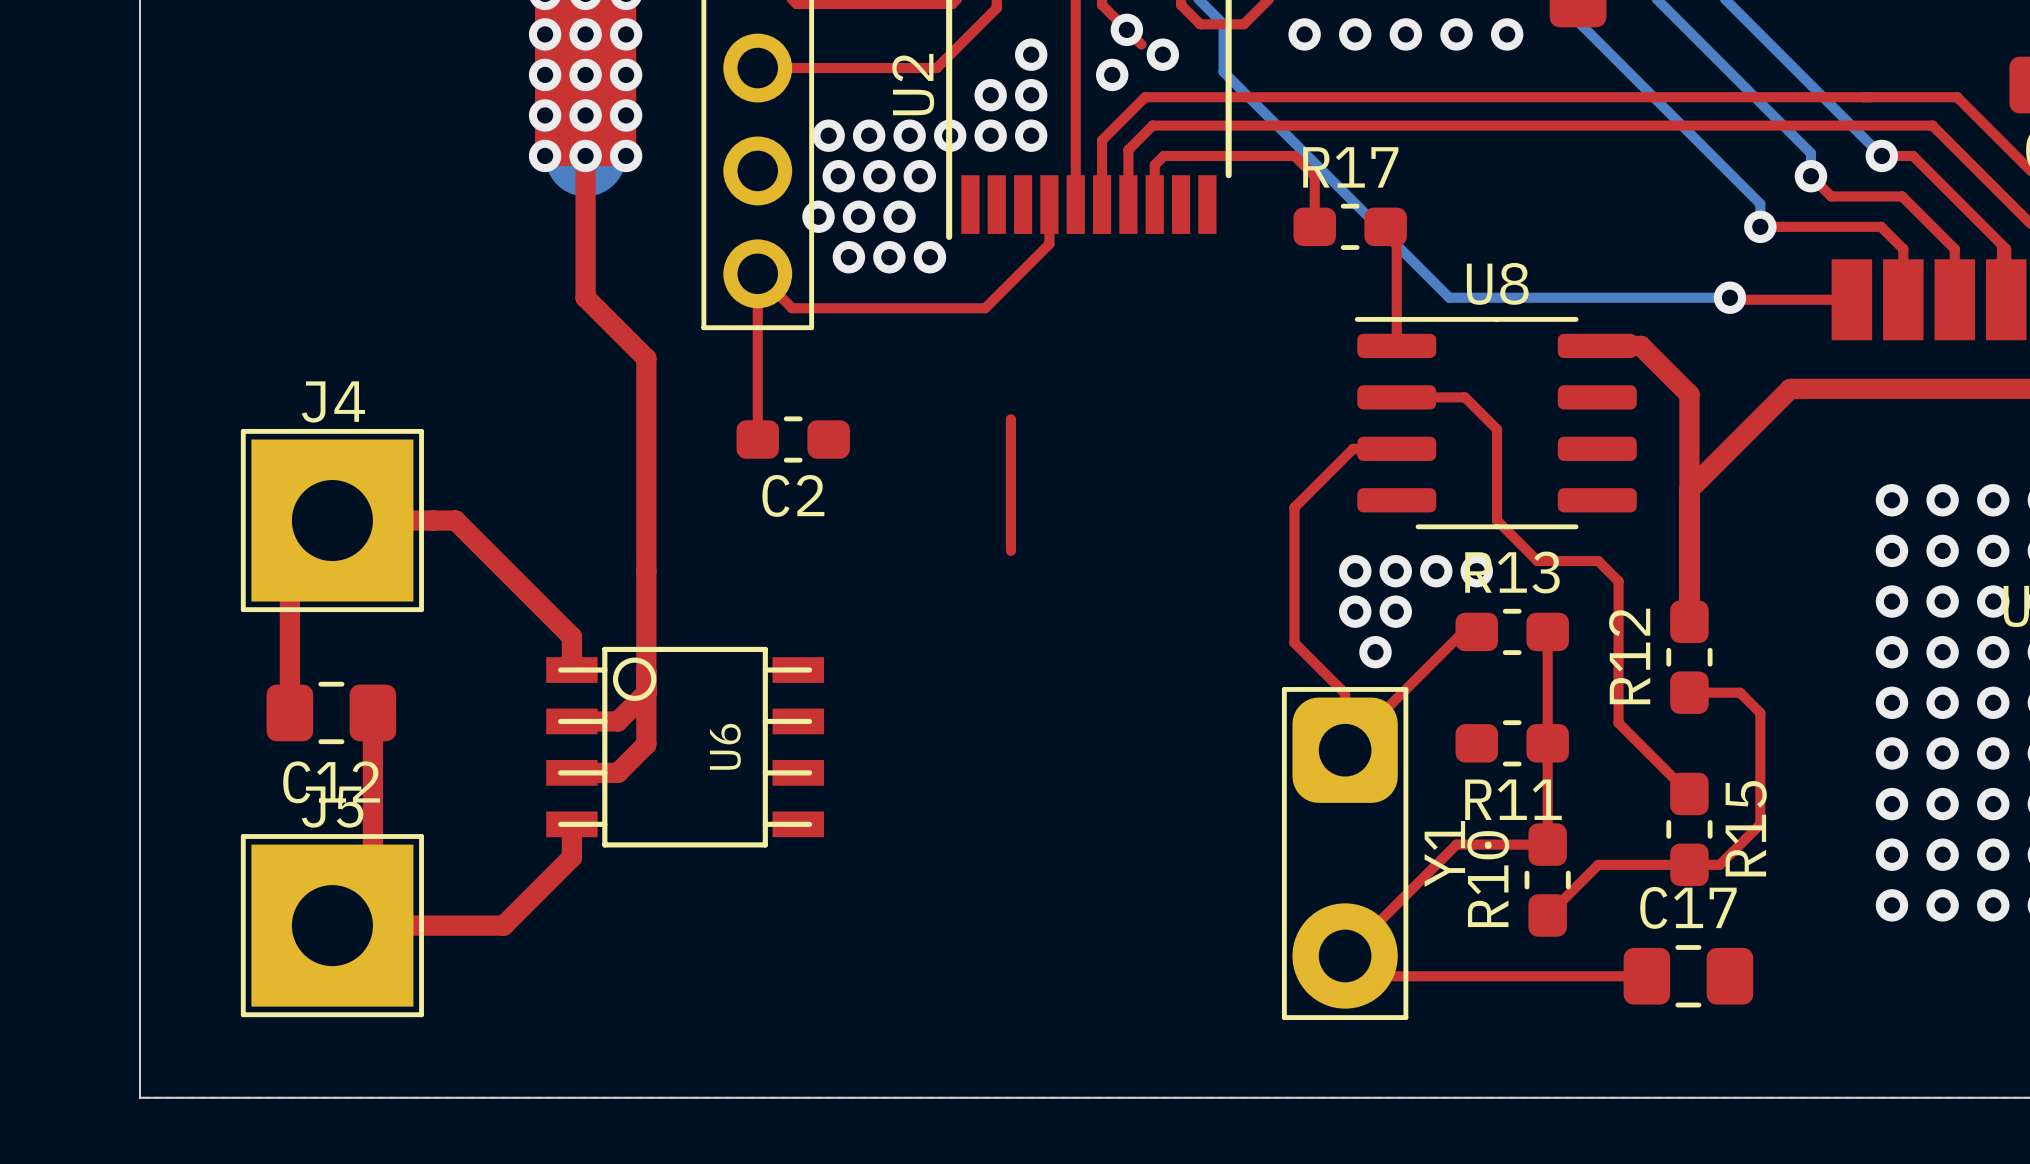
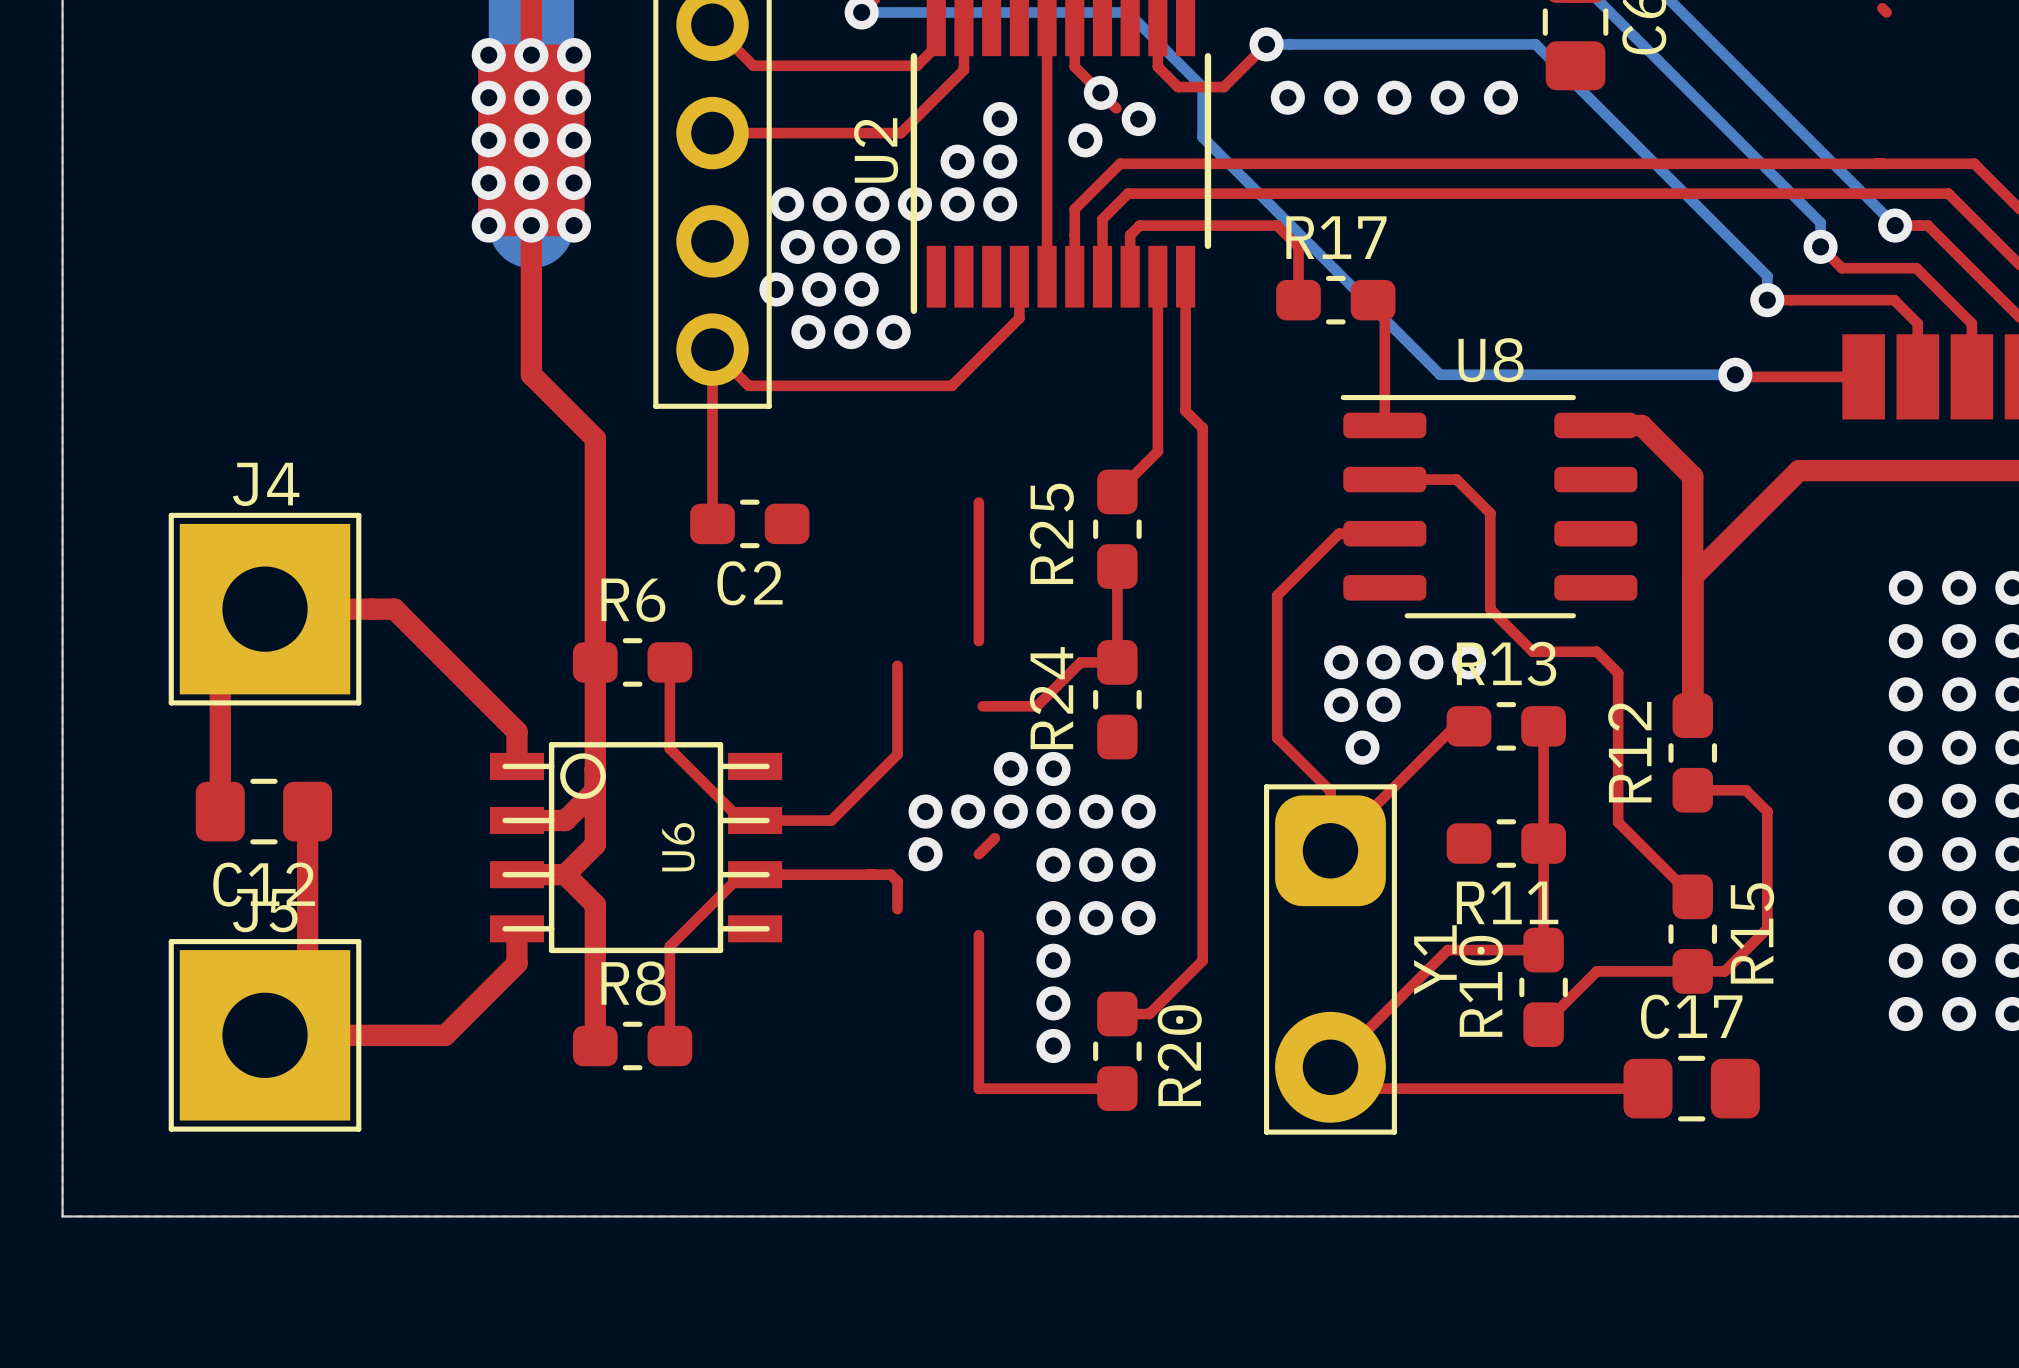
top track: none -> (1157, 276) (1157, 451) (1117, 491)
top track: none -> (1185, 276) (1185, 410) (1202, 428) (1202, 960) (1149, 1014) (1117, 1014)
R25: none -> (1117, 529)
top track: none -> (1117, 566) (1117, 662) (1080, 662) (1036, 706) (982, 706)
R6: none -> (632, 662)
top track: none -> (669, 662) (669, 748) (741, 820) (831, 820) (897, 754) (897, 665)
R24: none -> (1117, 699)
via: none -> (1010, 768)
via: none -> (1053, 768)
via: none -> (925, 811)
via: none -> (968, 811)
via: none -> (1010, 811)
via: none -> (1053, 811)
via: none -> (1096, 811)
via: none -> (1138, 811)
top track: none -> (994, 838) (978, 854)
via: none -> (925, 854)
via: none -> (1053, 864)
via: none -> (1096, 864)
via: none -> (1138, 864)
top track: none -> (565, 874) (595, 904) (595, 1045)
top track: none -> (897, 909) (897, 881) (890, 874) (741, 874) (669, 946) (669, 1045)
via: none -> (1053, 918)
via: none -> (1096, 918)
via: none -> (1138, 918)
top track: none -> (978, 935) (978, 1088) (1117, 1088)
via: none -> (1053, 960)
via: none -> (1053, 1003)
R8: none -> (632, 1045)
via: none -> (1053, 1045)
R20: none -> (1117, 1051)

